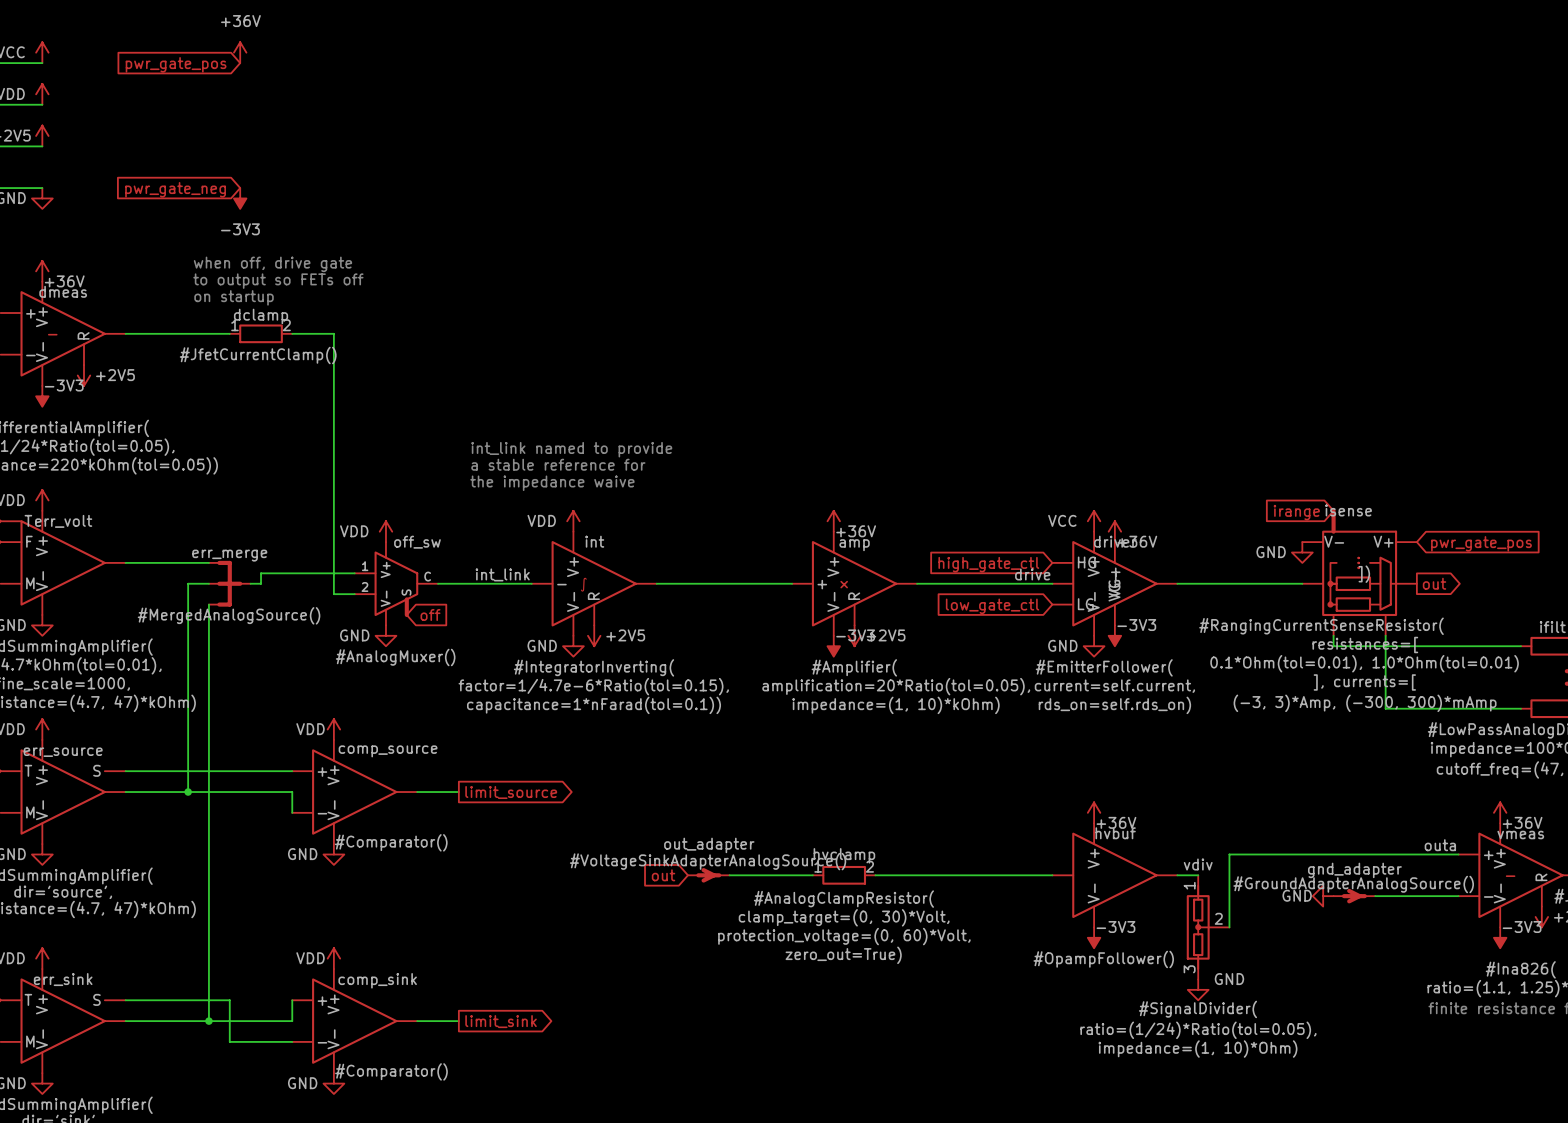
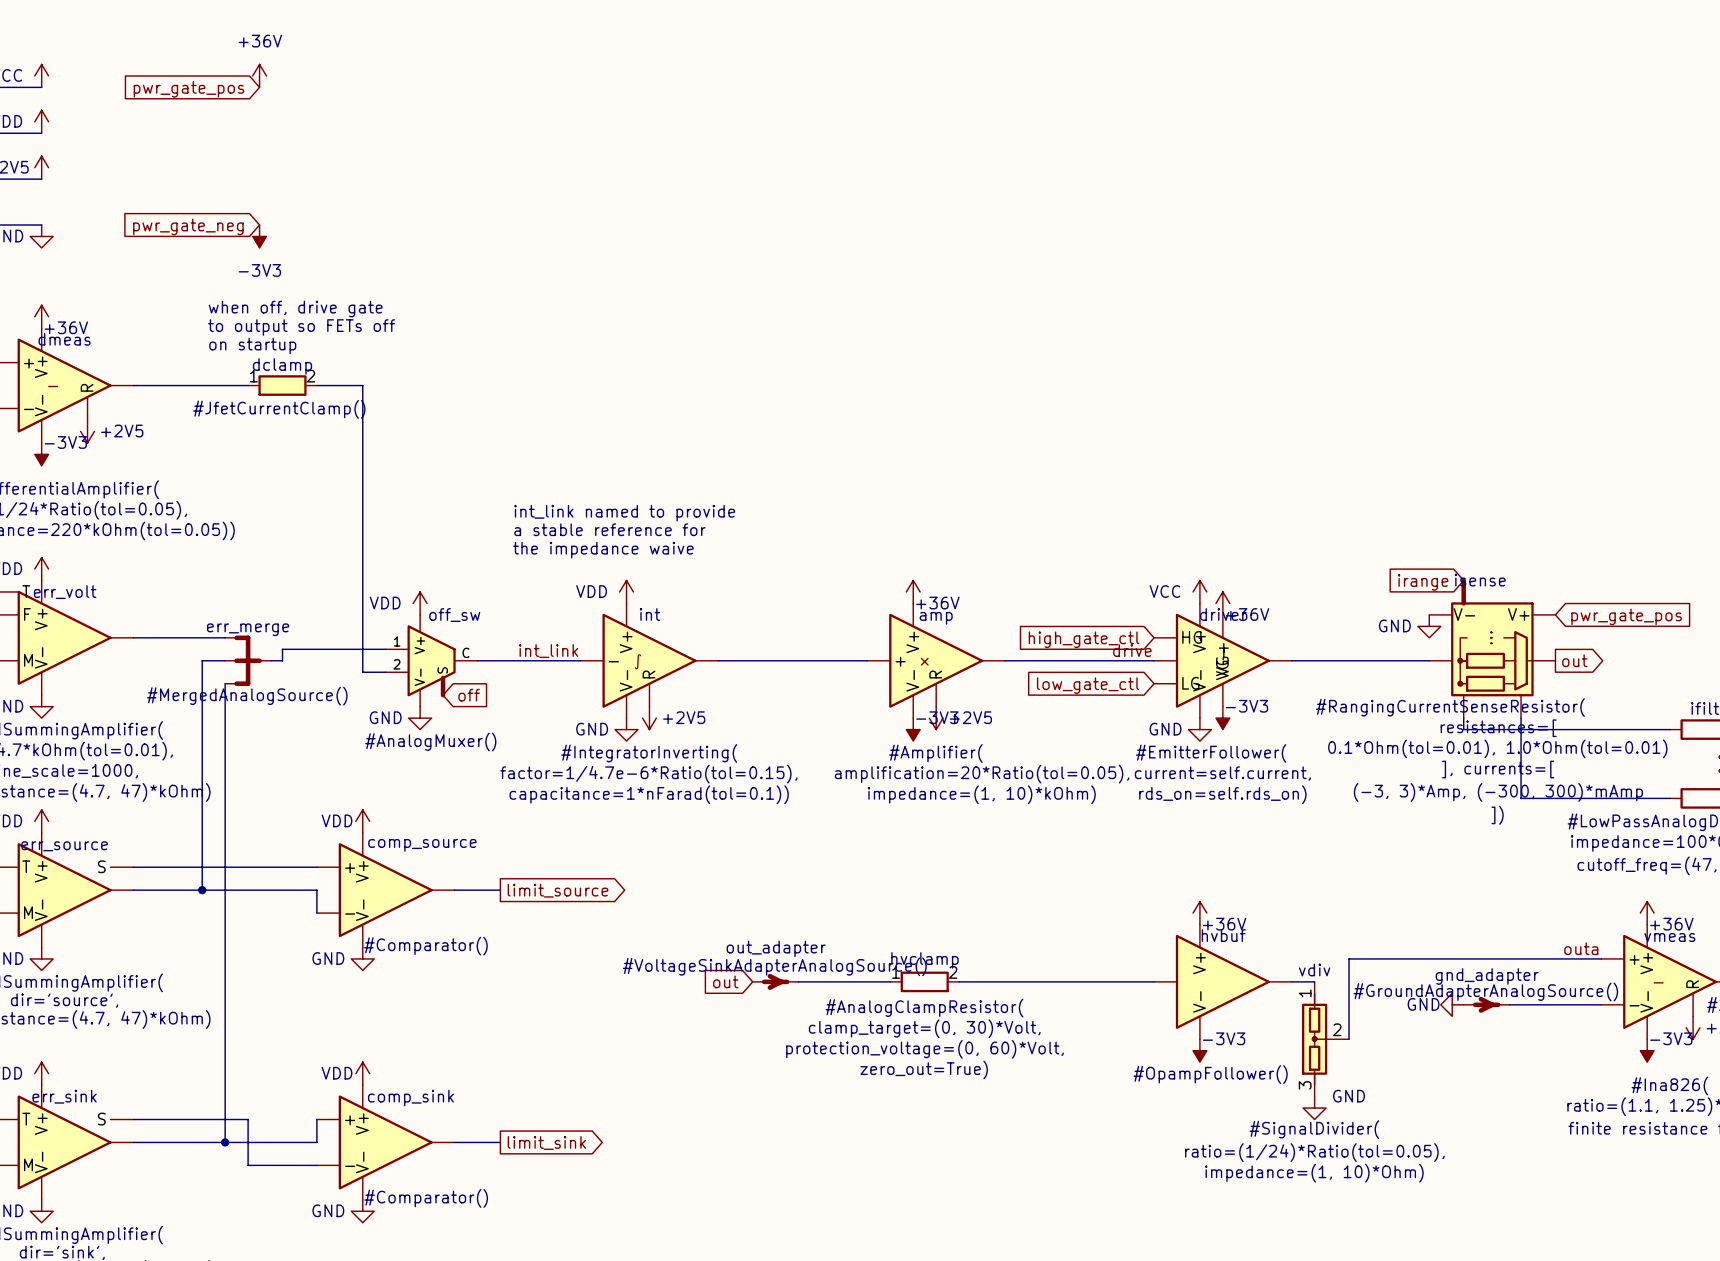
isense text position: ]) (1364, 574) -> ]) (1497, 815)

